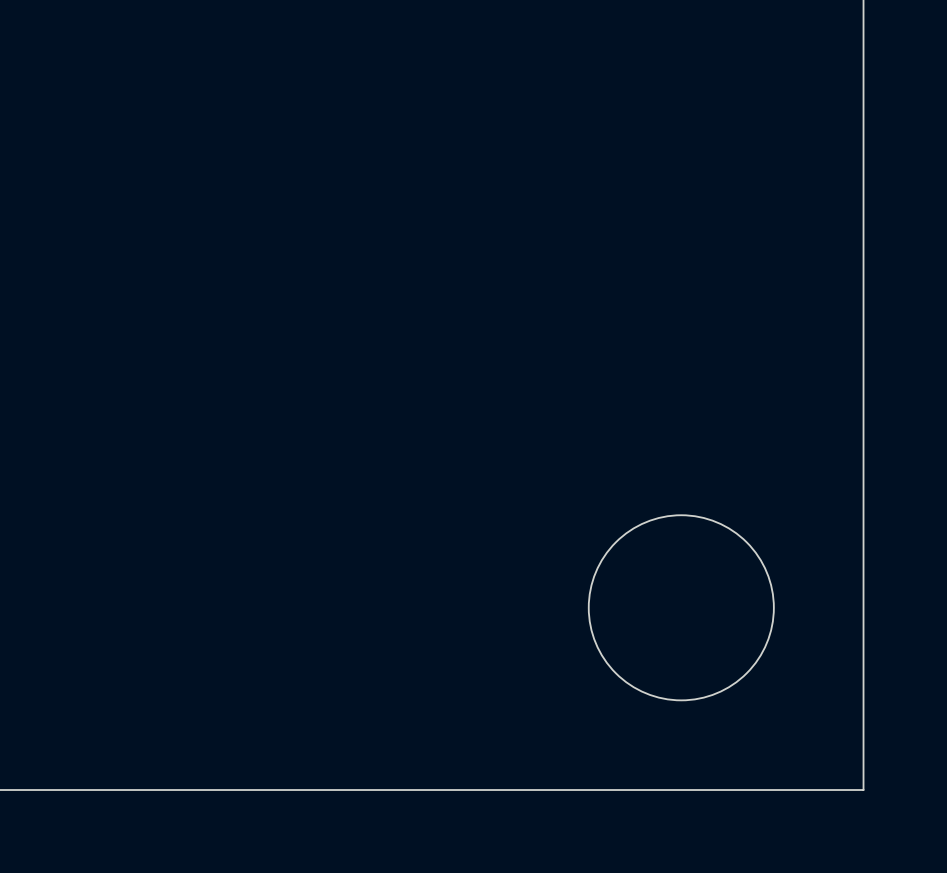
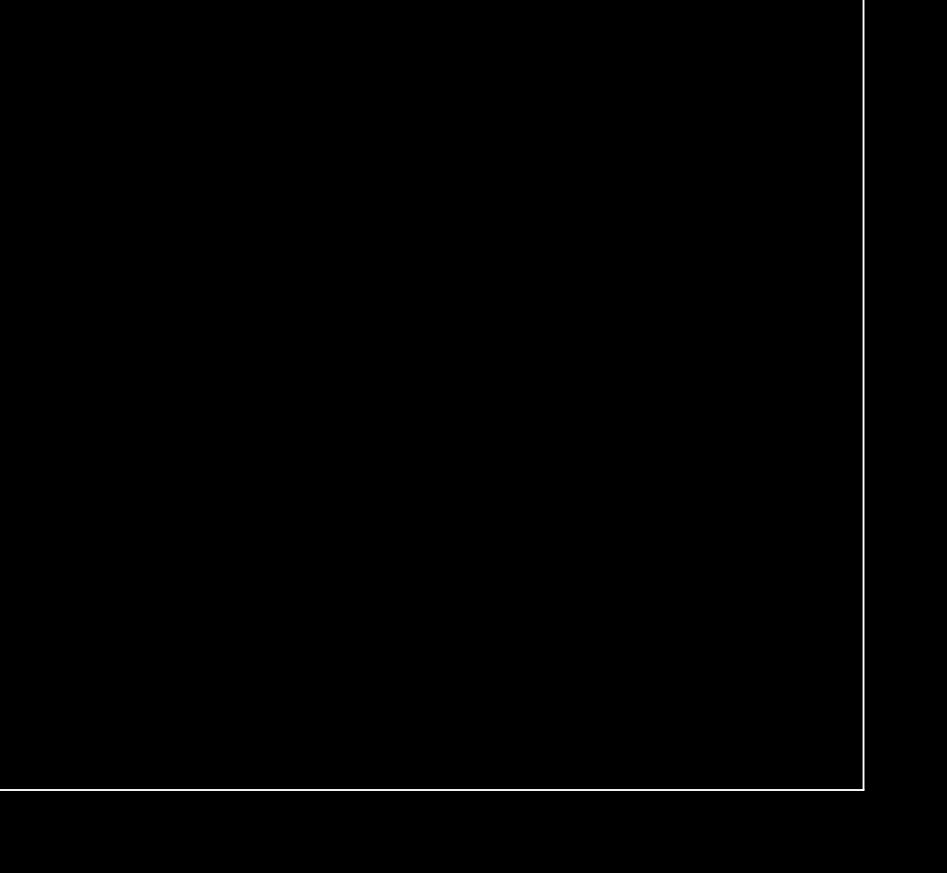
round board edge: [587, 514, 775, 702] -> none

